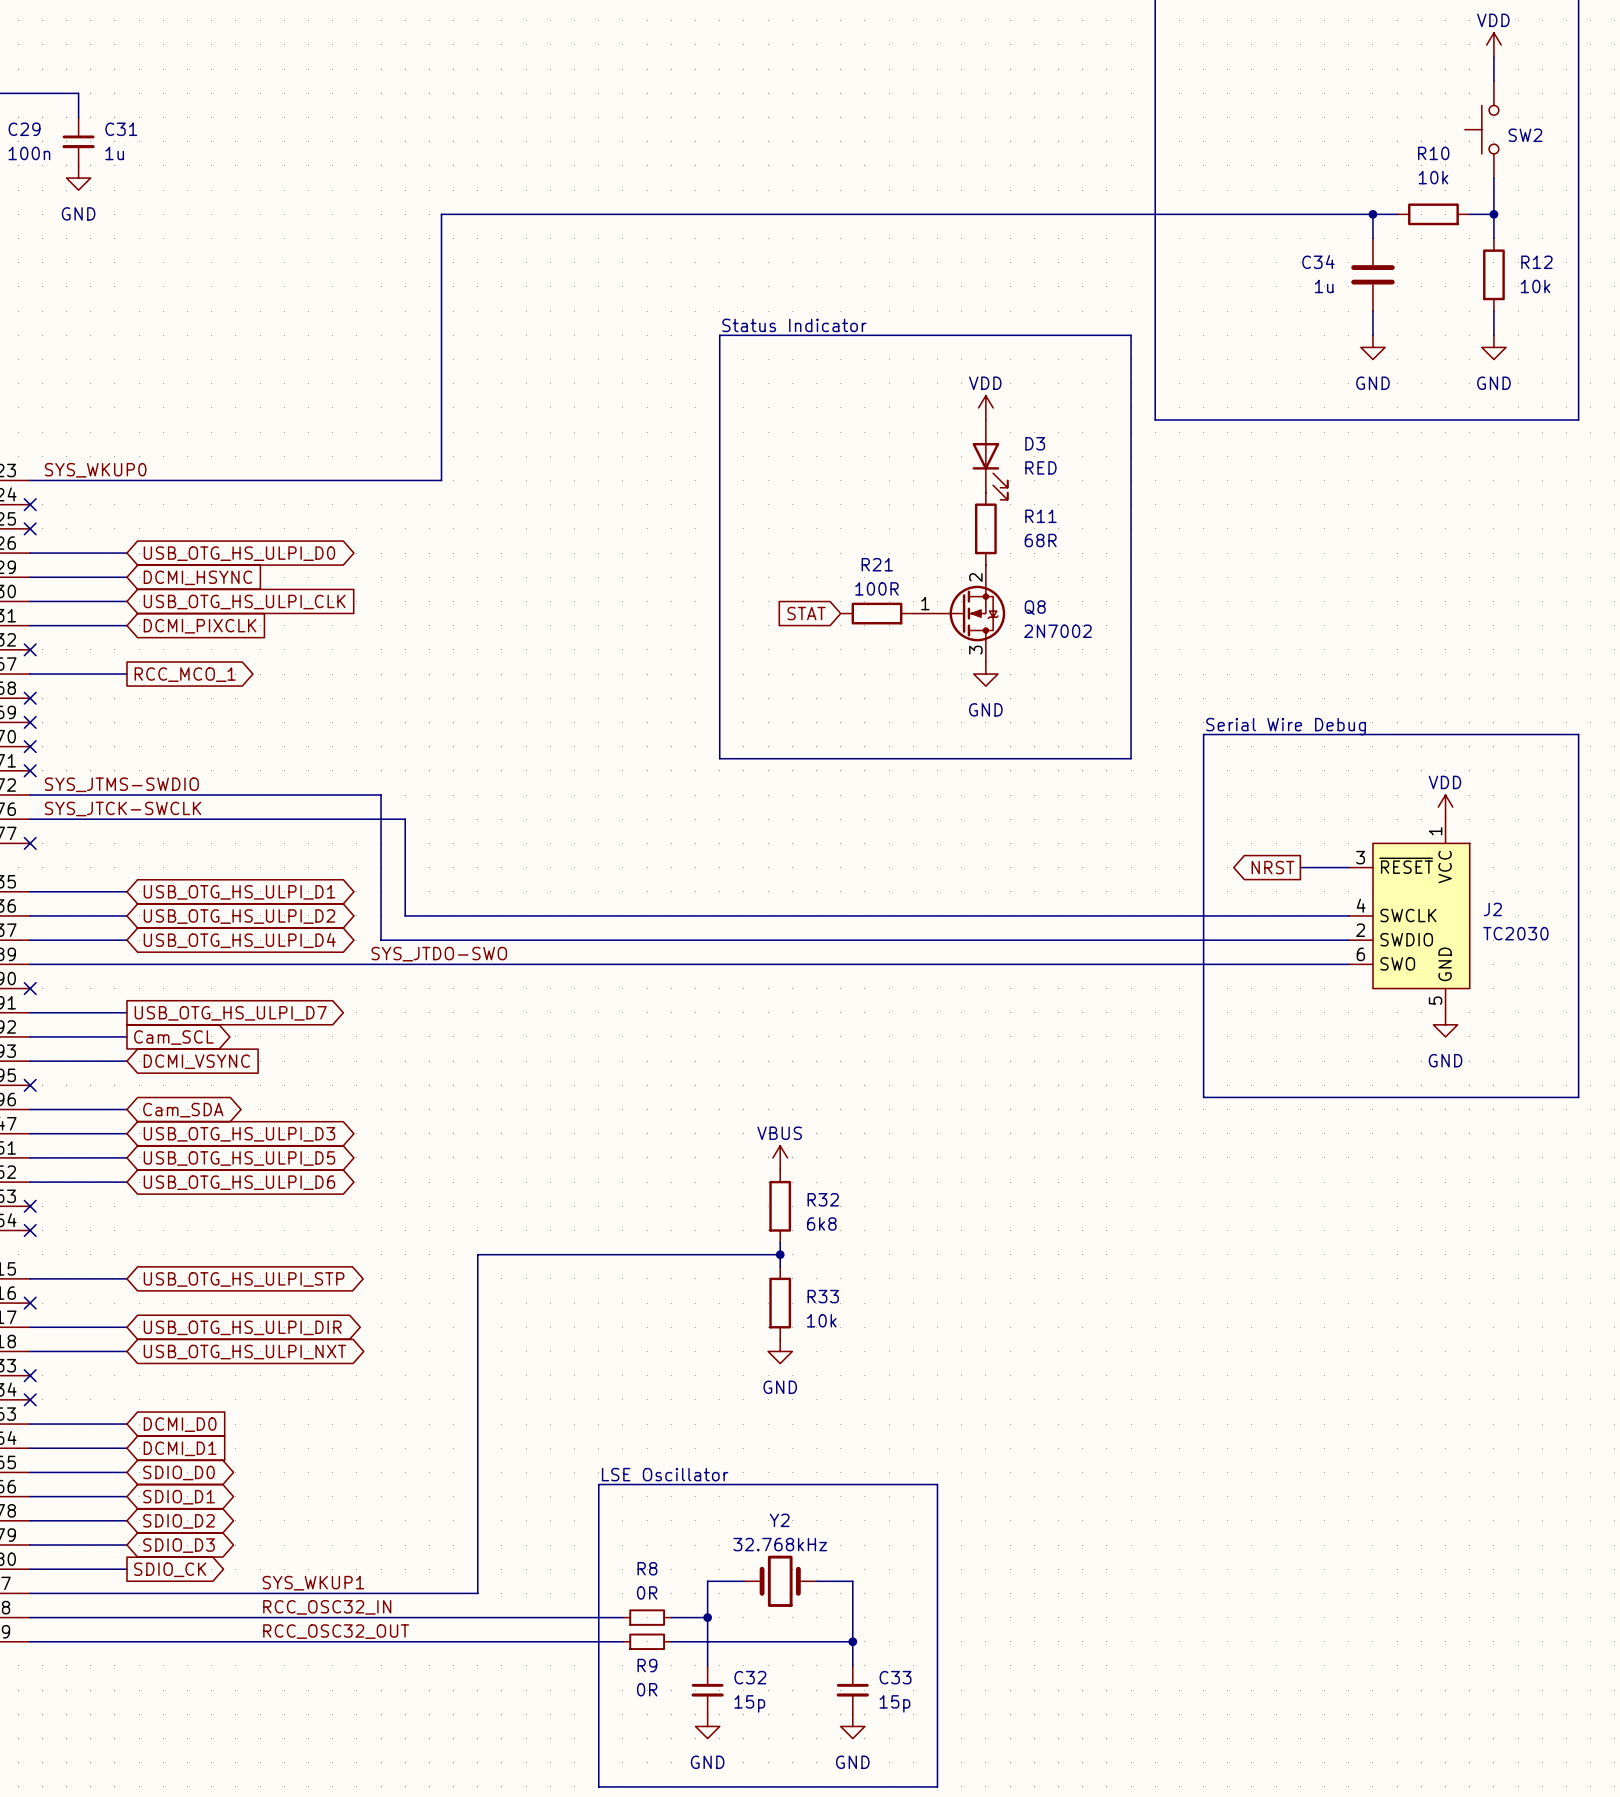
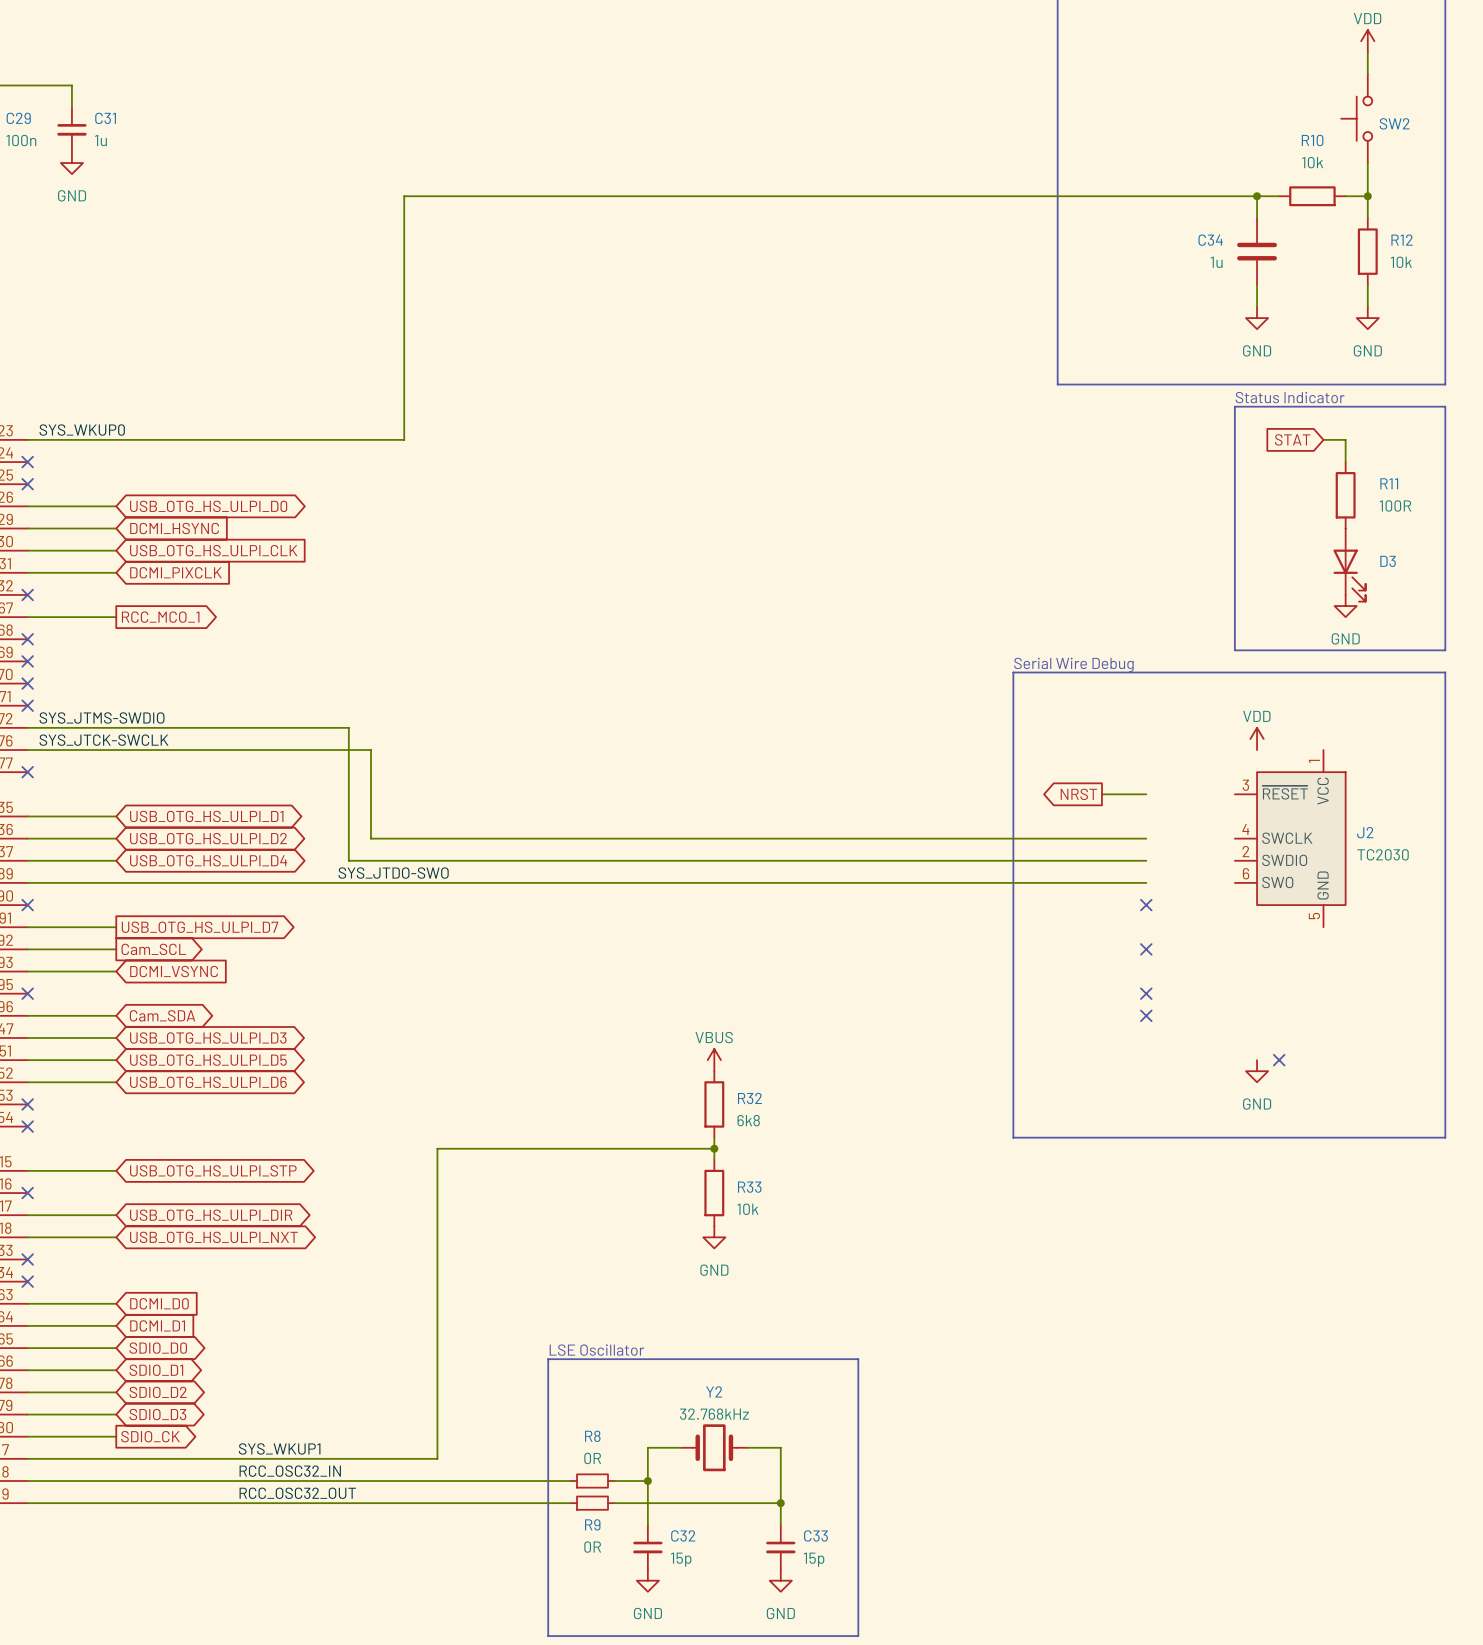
text: Status Indicator (794, 325) -> none
line: (719, 335) (719, 758) (1131, 758) (1131, 335) (719, 335) -> none
power symbol: VDD (985, 407) -> none
text: none -> Status Indicator (1290, 397)
D3 name position: D3 (1035, 443) -> D3 (1388, 561)
line: none -> (1234, 406) (1234, 650) (1445, 650) (1445, 406) (1234, 406)
D3 position: (990, 459) -> (1349, 565)
D3 value: RED (1040, 467) -> none
global label: none -> STAT (1292, 439)
wire: none -> (1323, 439) (1345, 439) (1345, 462)
R11 position: (985, 528) -> (1345, 495)
R11 value: 68R (1040, 540) -> 100R (1395, 505)
global label: STAT (806, 613) -> none
R21: 100R (876, 613) -> none
Q8: 2N7002 (959, 613) -> none
power symbol: none -> GND (1345, 606)
power symbol: GND (985, 674) -> none
text position: Serial Wire Debug (1286, 726) -> Serial Wire Debug (1073, 664)
line: (1203, 734) (1203, 1097) (1578, 1097) -> (1101, 672) (1013, 672) (1013, 1137) (1445, 1137) (1445, 1004)
power symbol position: VDD (1445, 807) -> VDD (1257, 738)
global label position: NRST (1273, 867) -> NRST (1078, 794)
wire: (1300, 867) (1348, 867) -> (1101, 794) (1146, 794)
wire: (1251, 915) (1348, 915) -> none
wire: (1251, 940) (1348, 940) -> none
wire: (1251, 964) (1348, 964) -> none
no-connect mark: none -> (1146, 905)
power symbol position: GND (1445, 1024) -> GND (1257, 1071)
no-connect mark: none -> (1146, 949)
no-connect mark: none -> (1146, 993)
no-connect mark: none -> (1146, 1015)
no-connect mark: none -> (1279, 1060)

